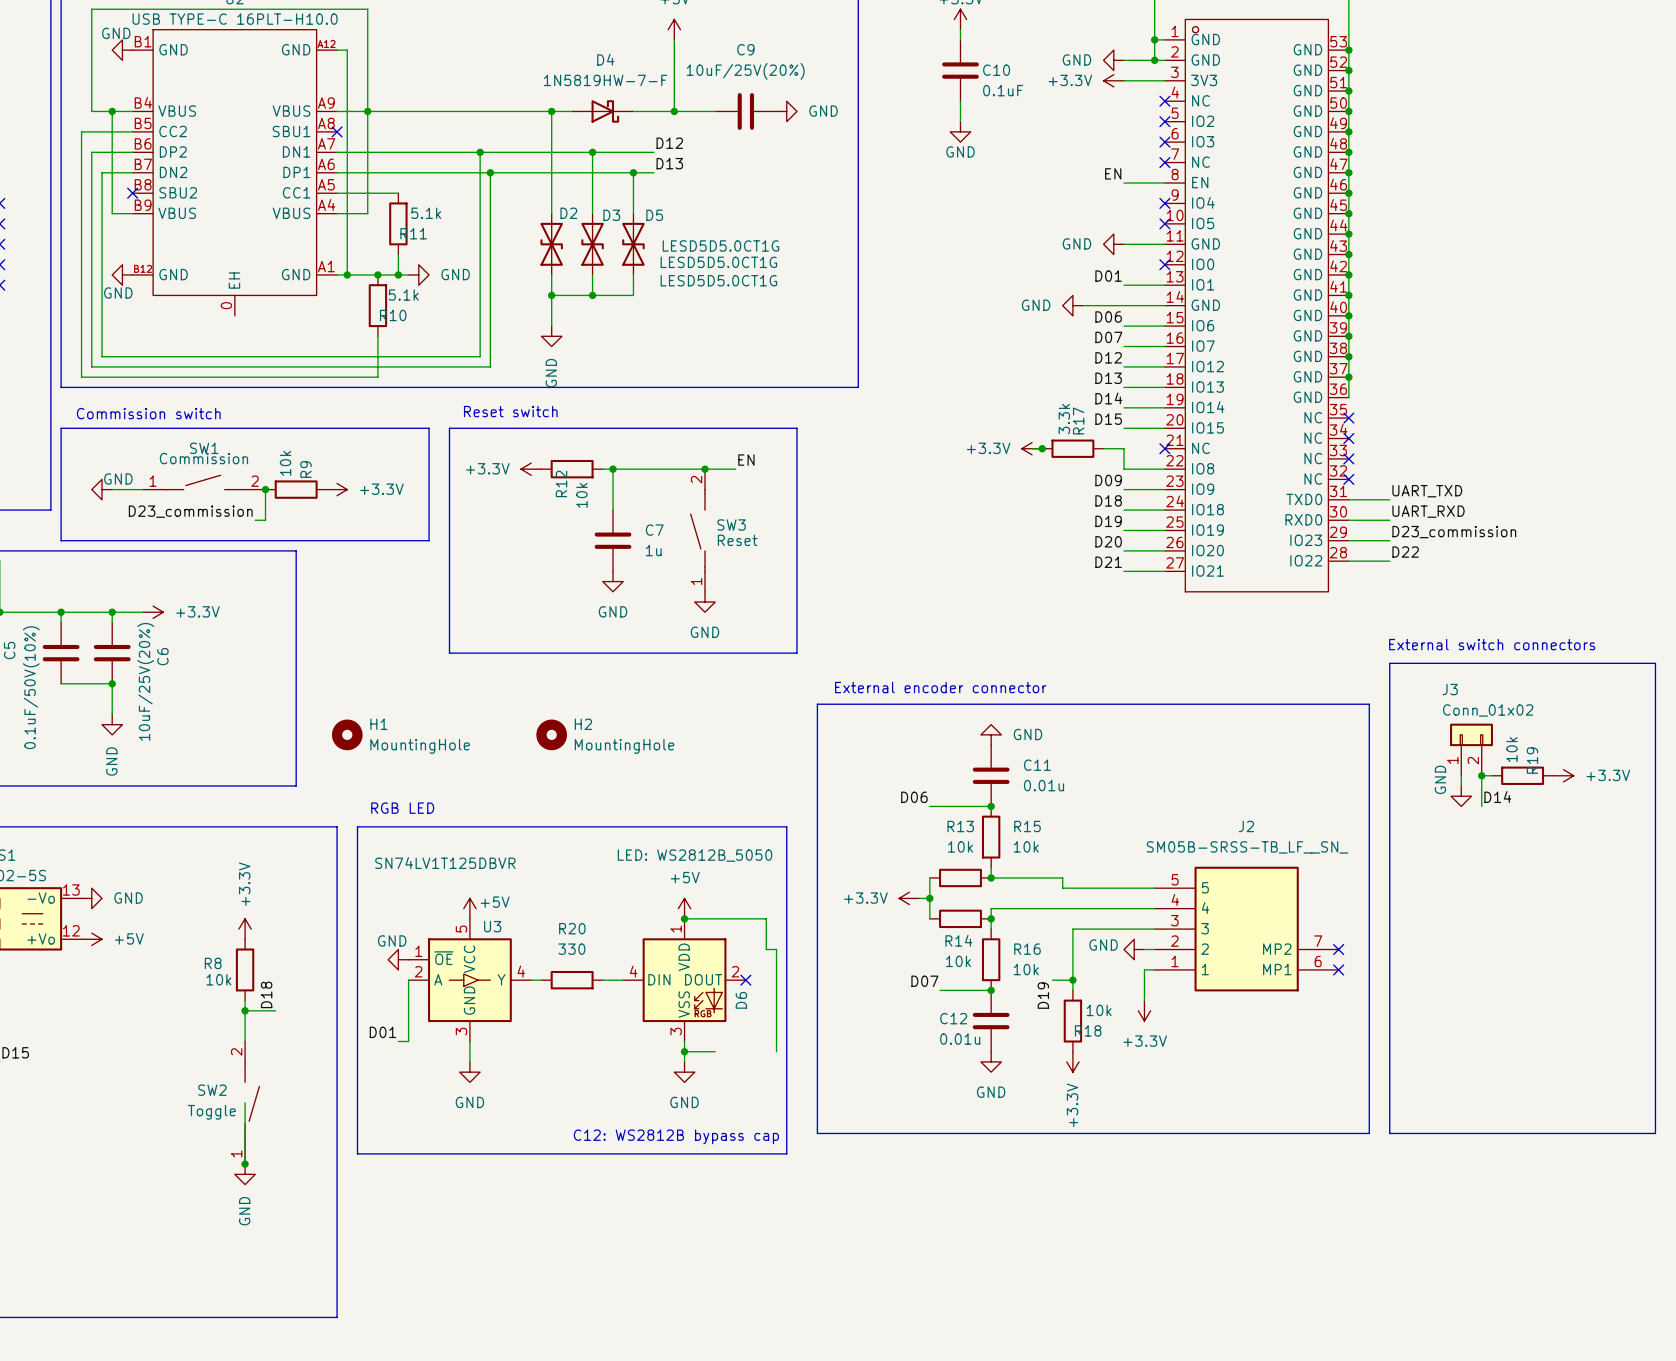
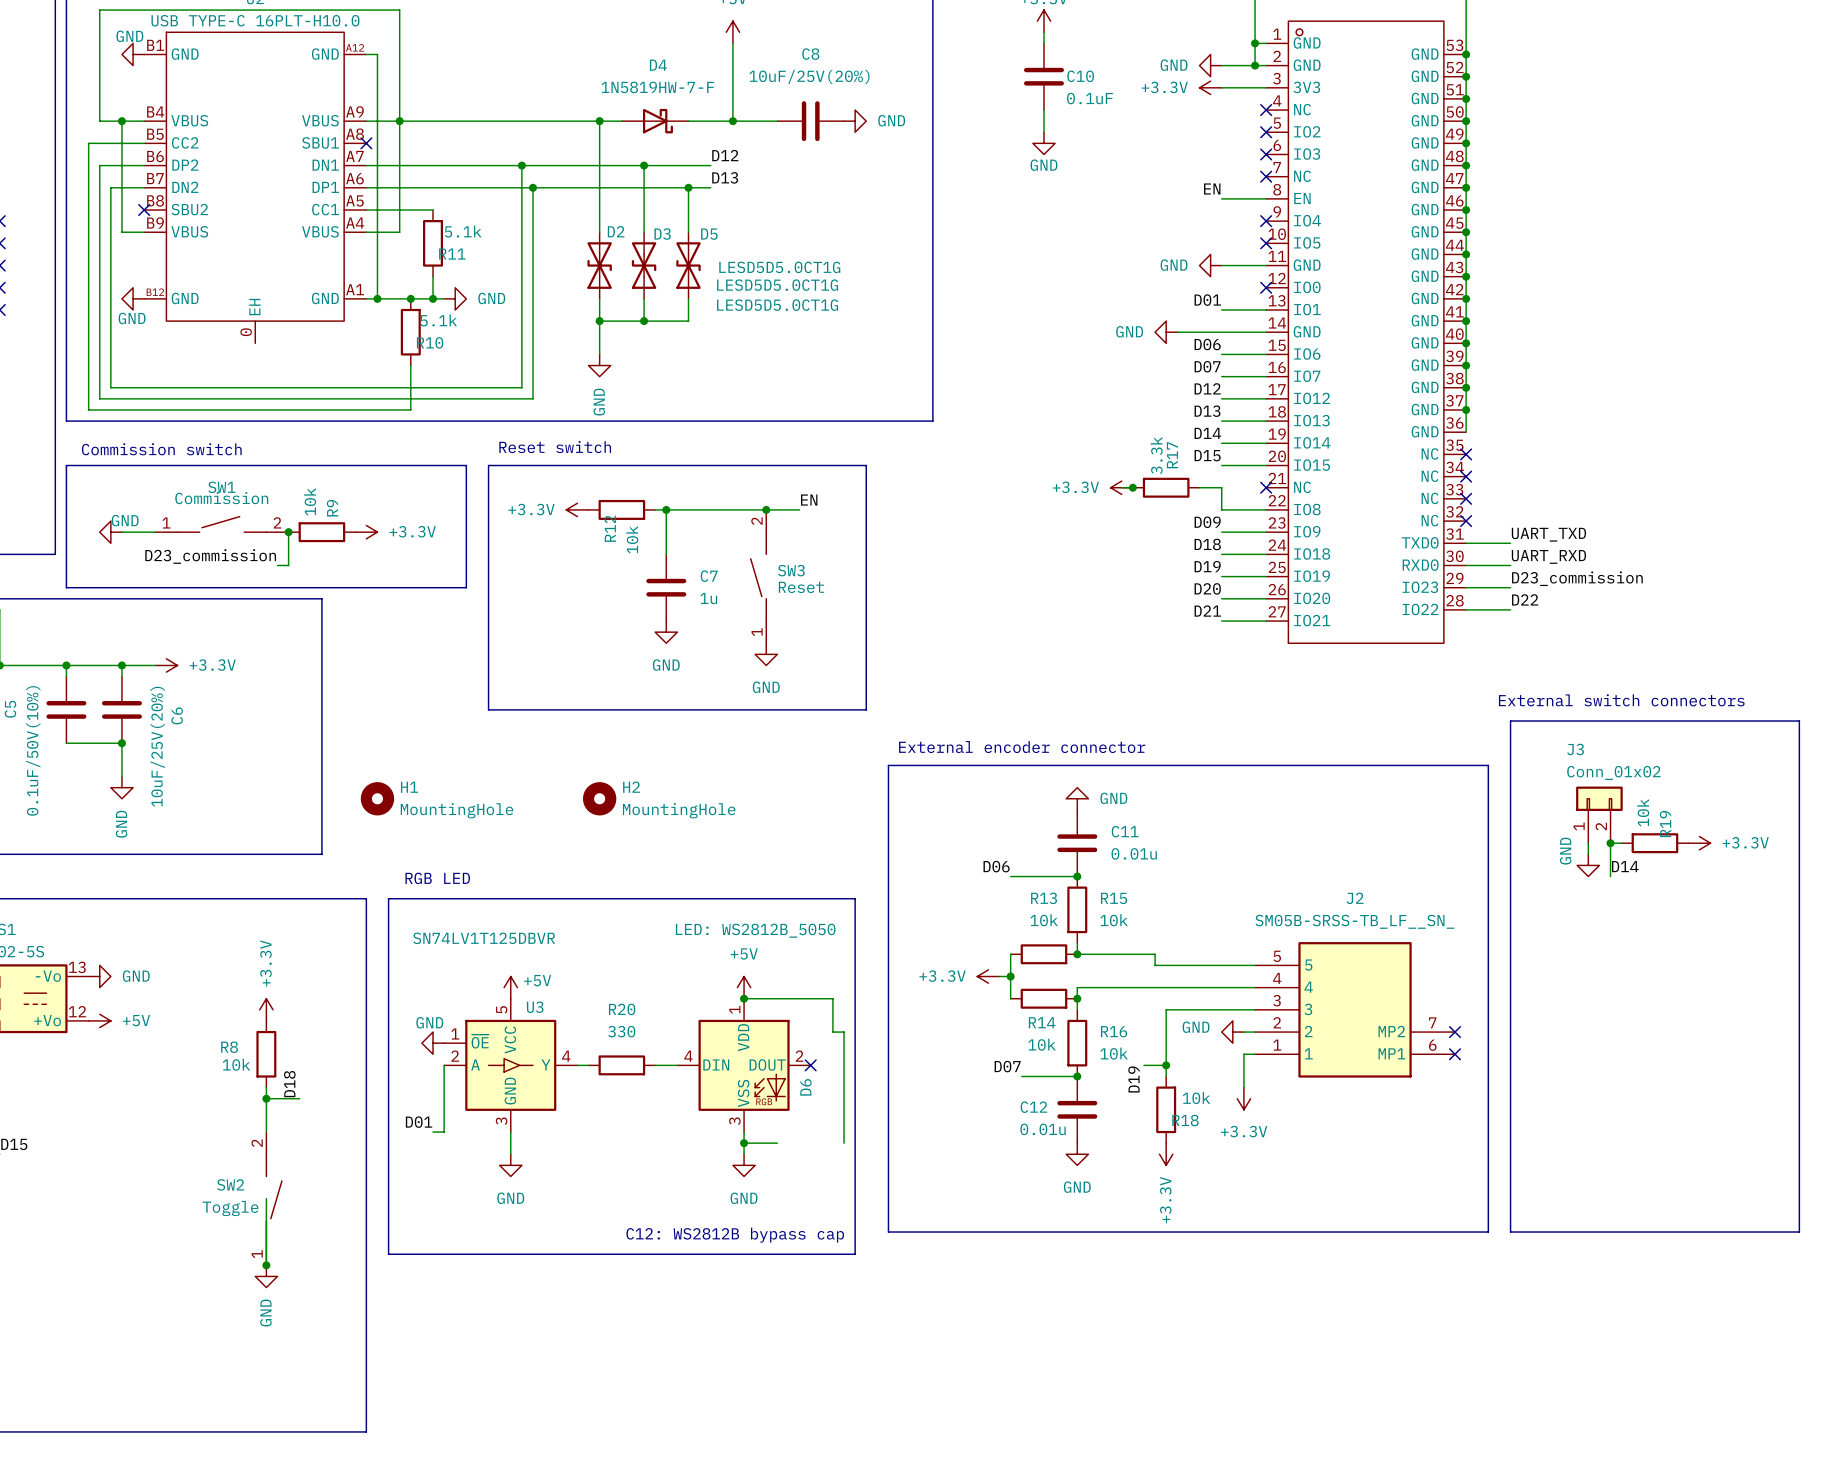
C9 name: C9 (745, 49) -> C8 (810, 54)

